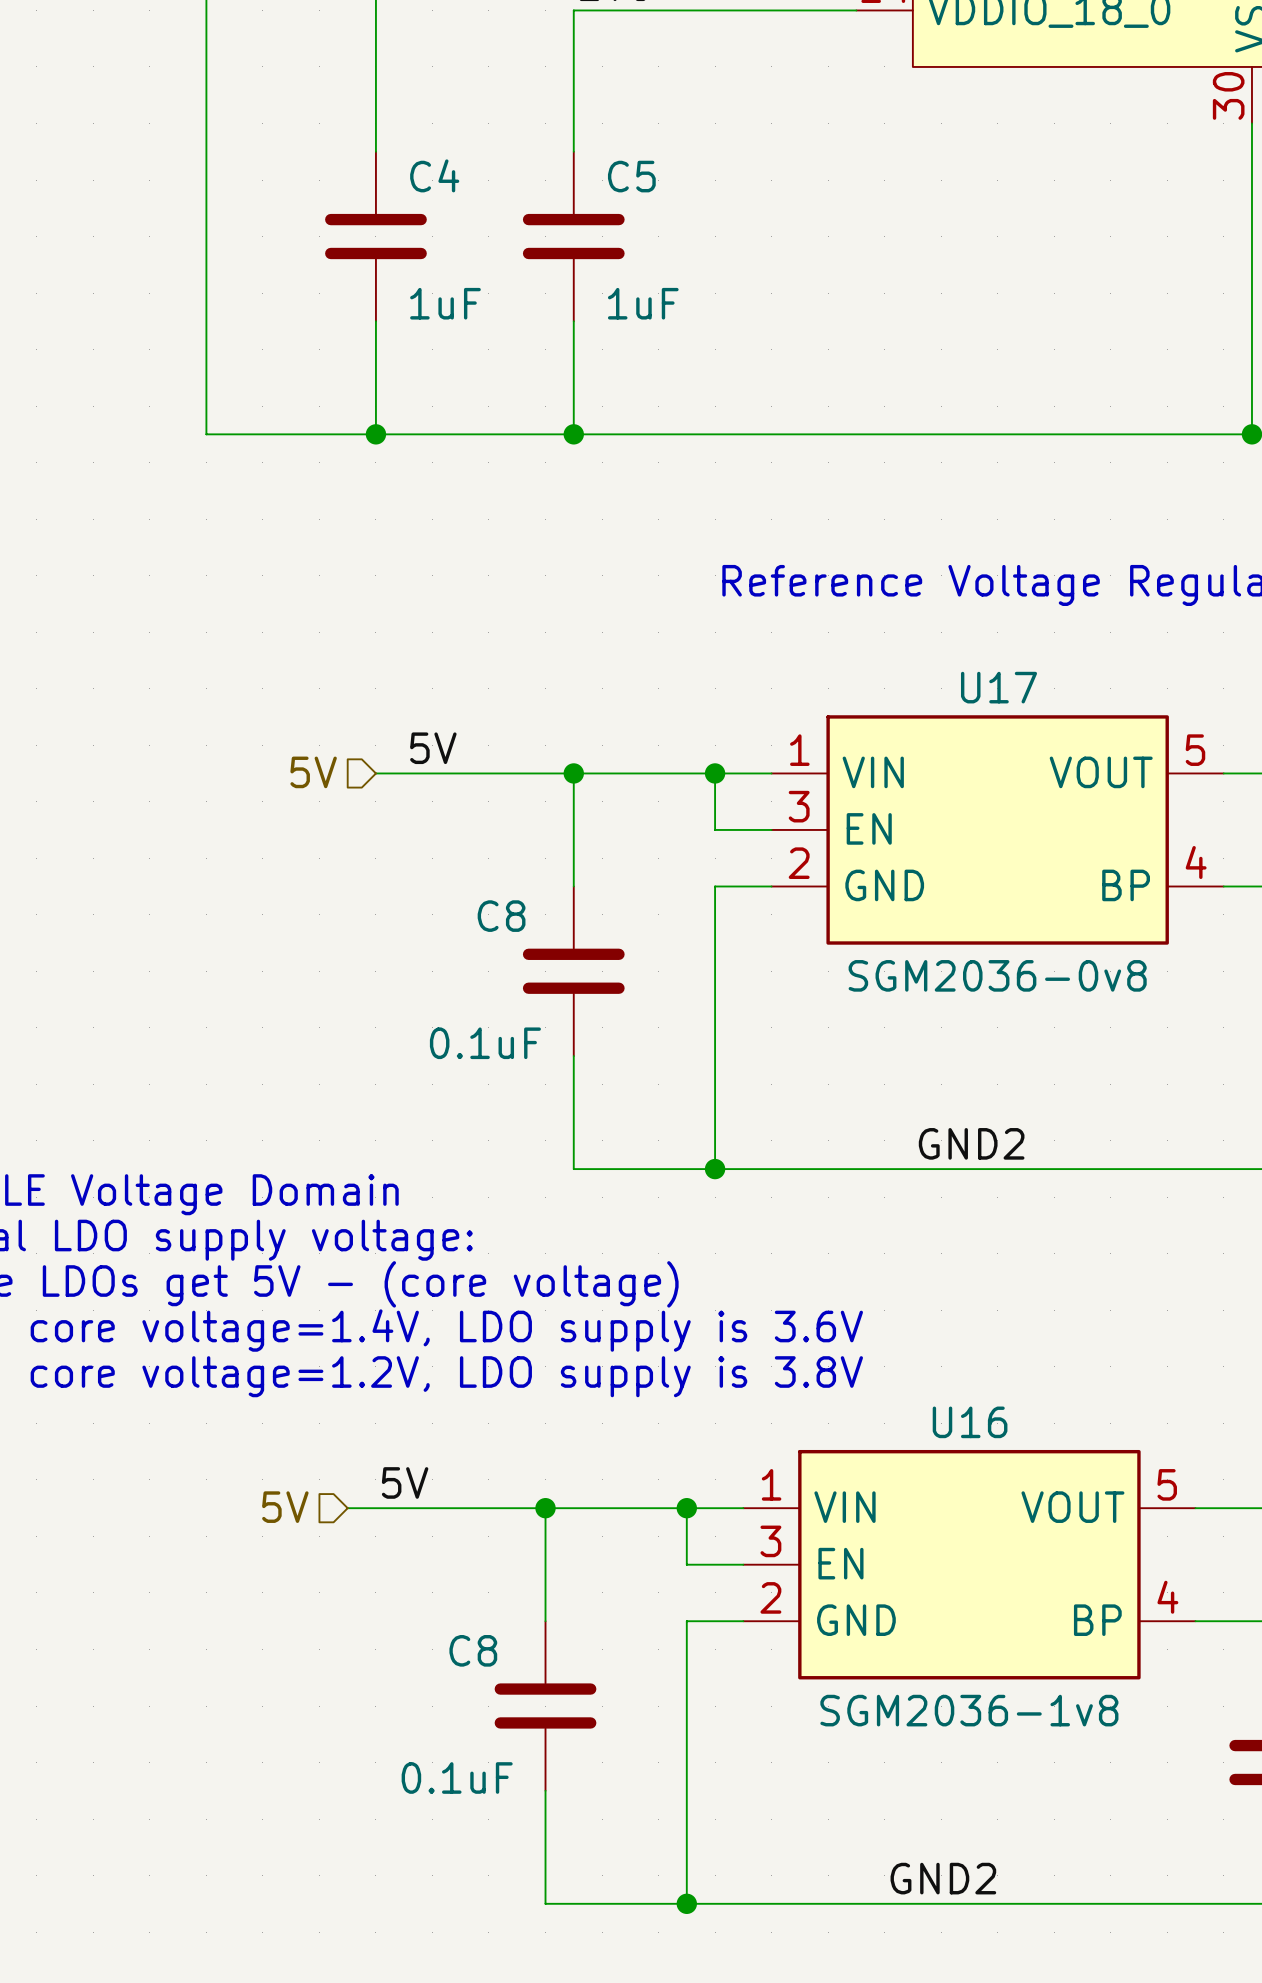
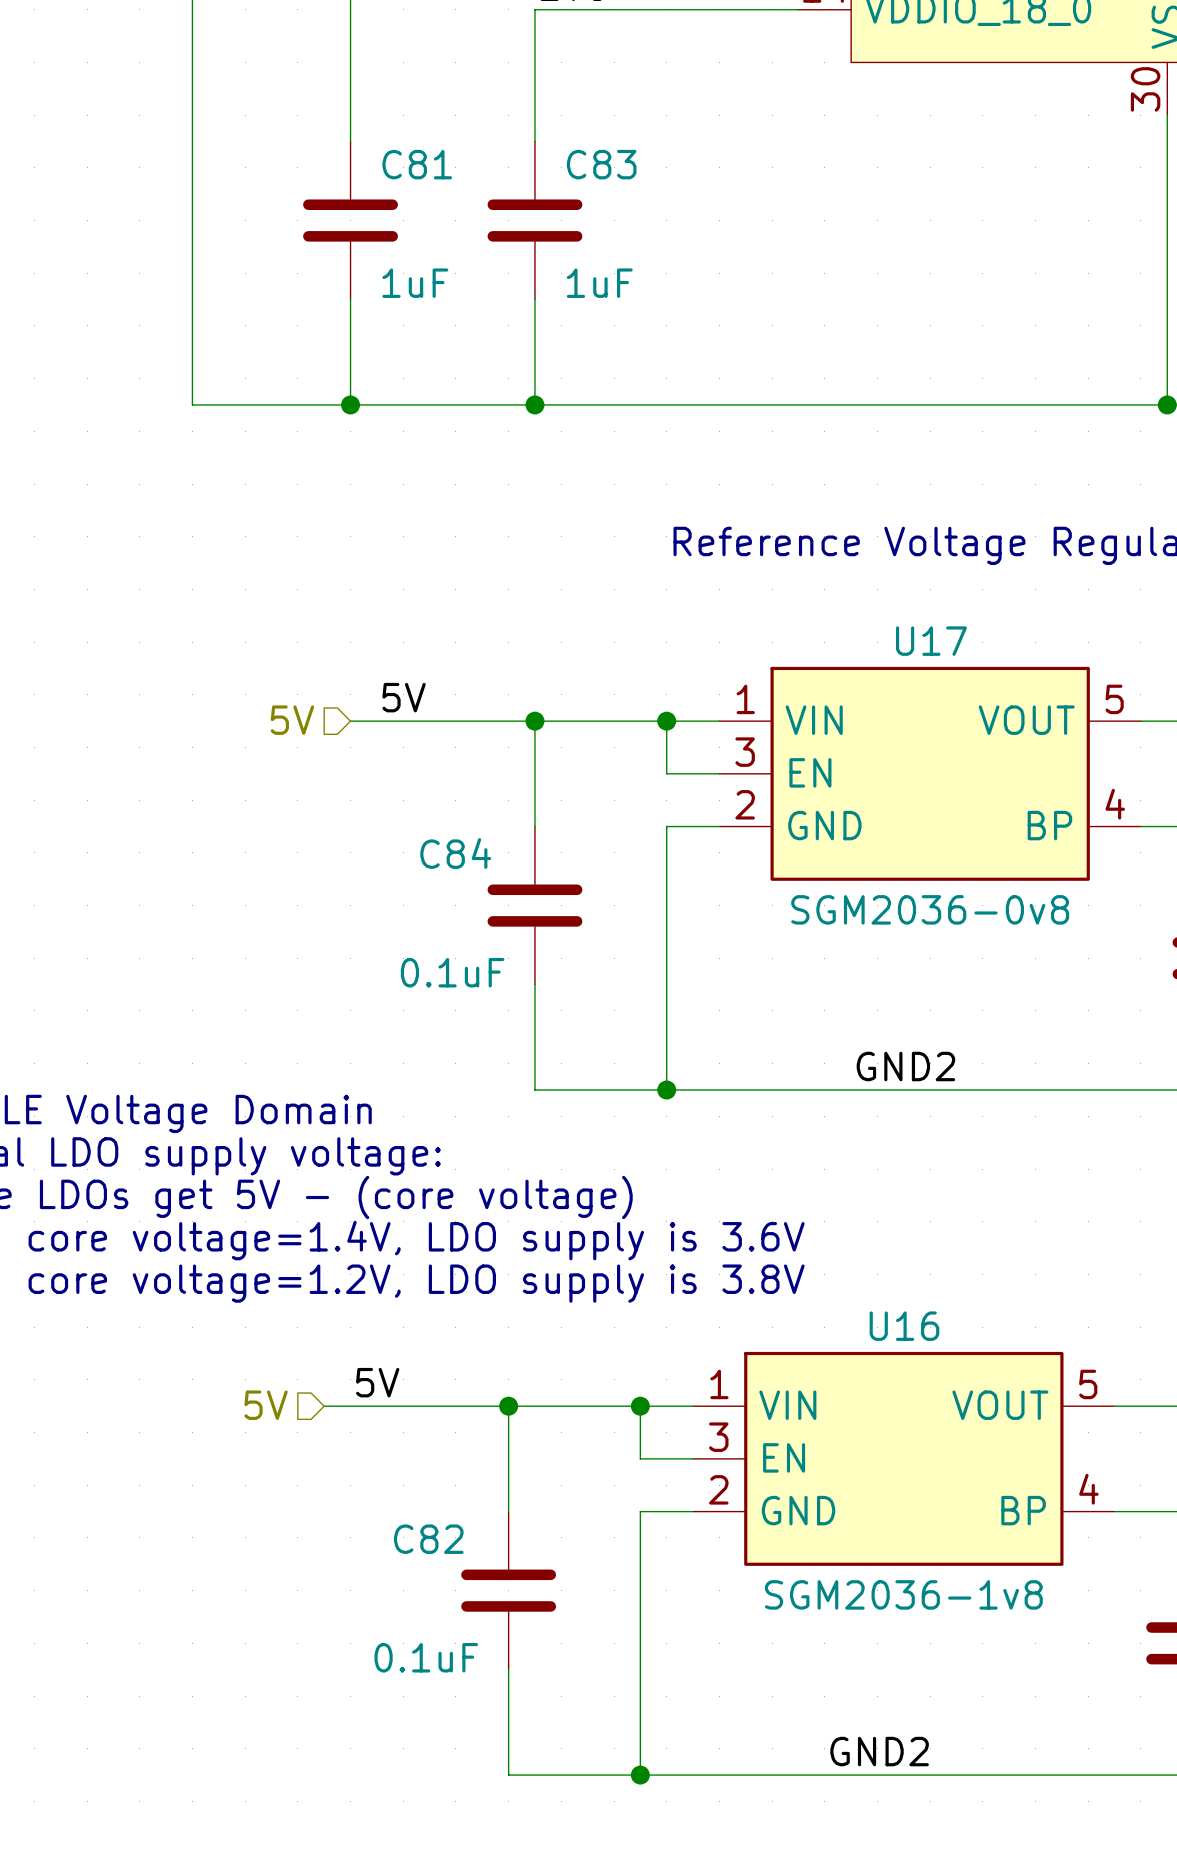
C4 name: C4 (434, 175) -> C81 (417, 164)
C5 name: C5 (631, 176) -> C83 (601, 164)
C8 name: C8 (501, 916) -> C84 (455, 853)
C8 name: C8 (473, 1650) -> C82 (428, 1539)

